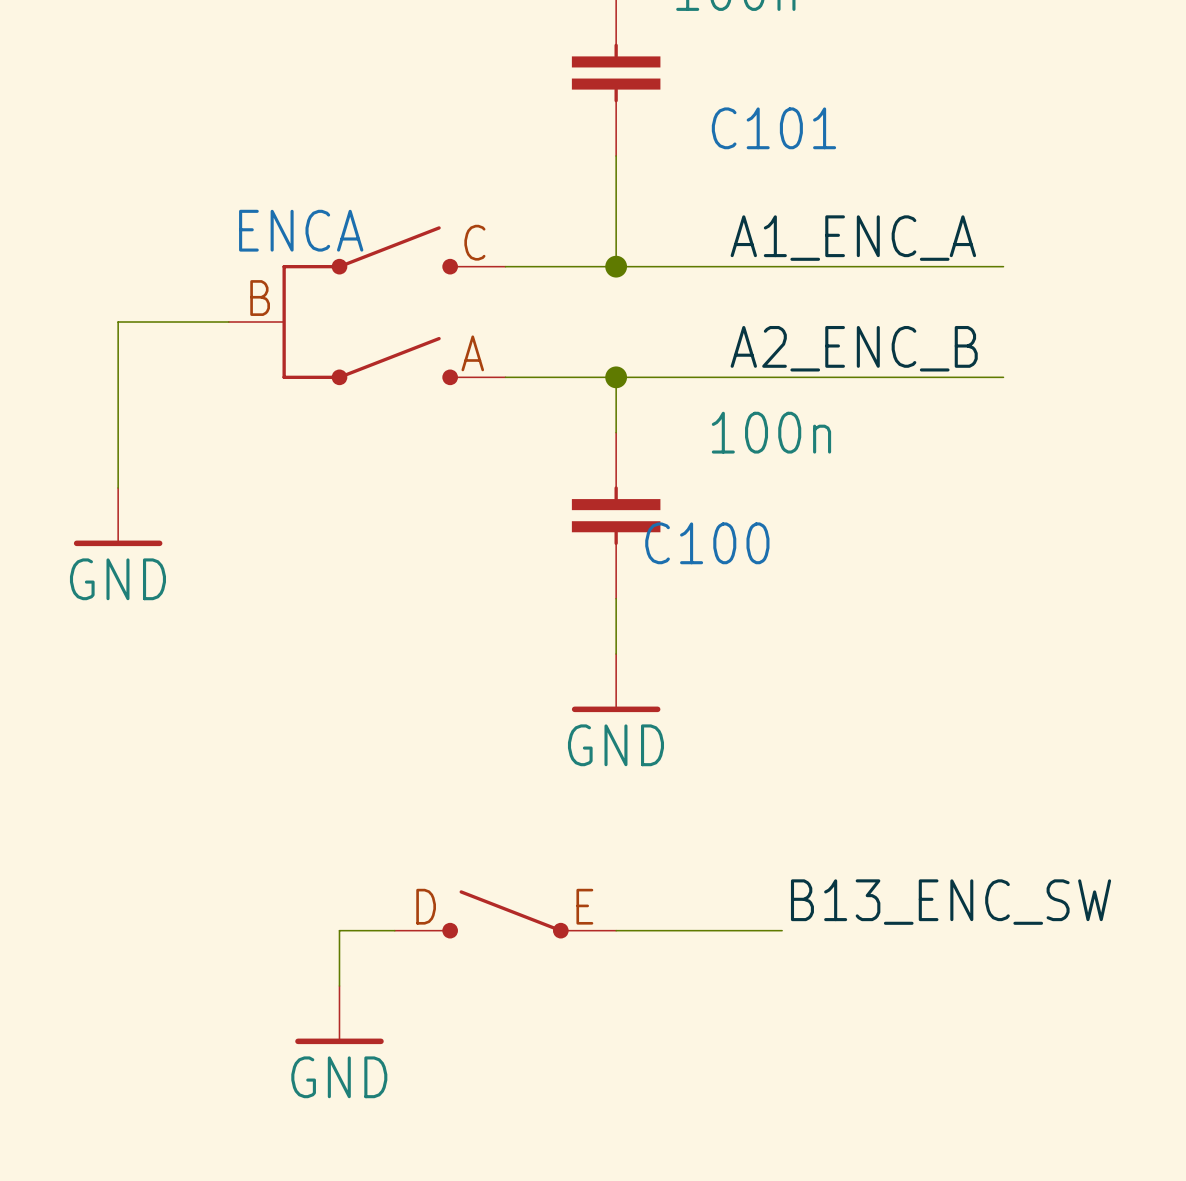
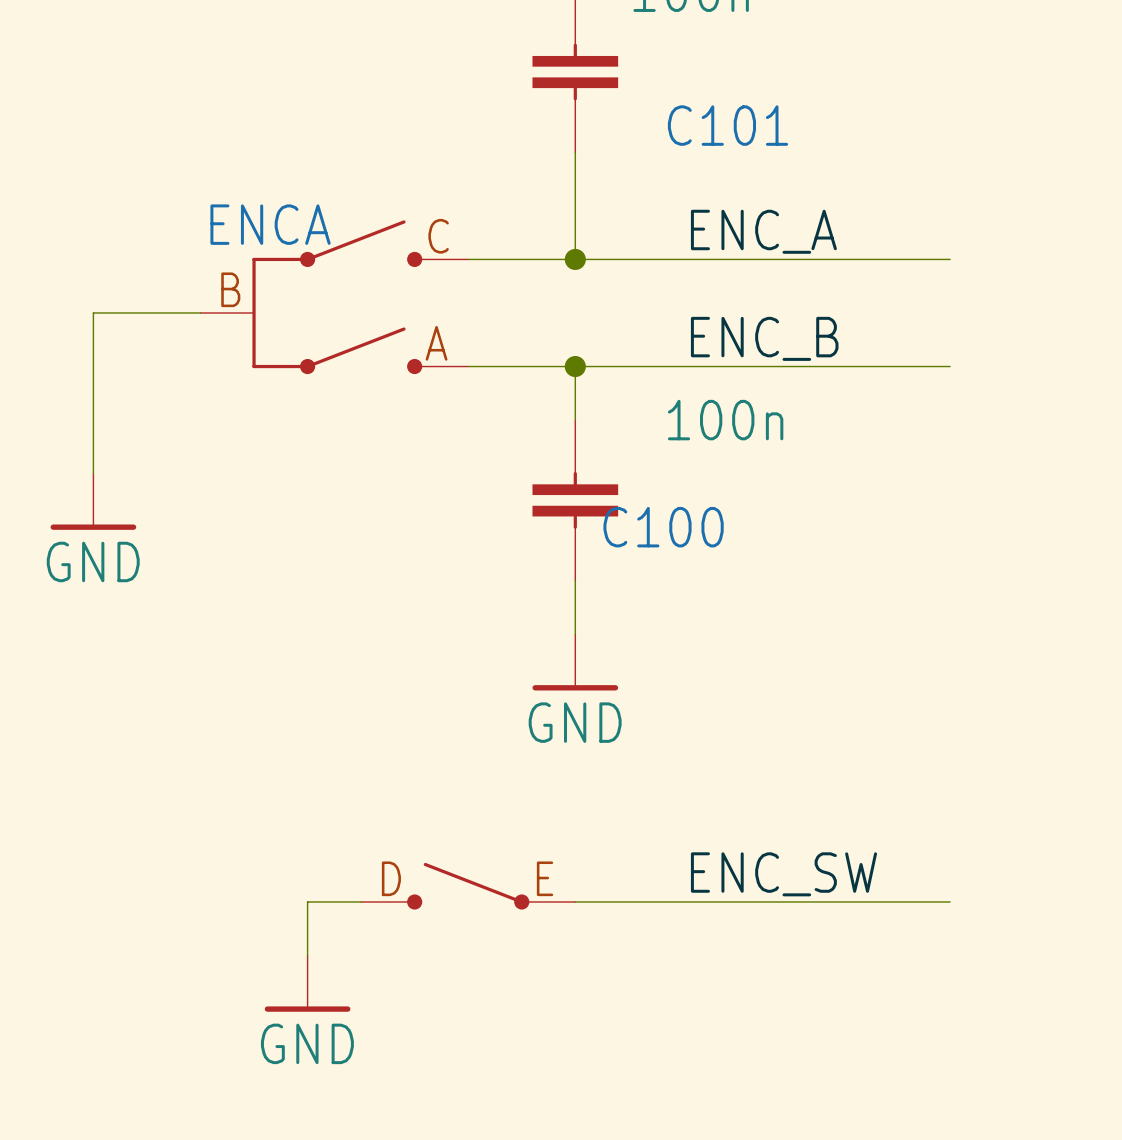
label: A1_ENC_A (853, 238) -> ENC_A (763, 231)
label: A2_ENC_B (854, 348) -> ENC_B (764, 338)
label: B13_ENC_SW (951, 902) -> ENC_SW (783, 874)
wire: none -> (735, 901) (950, 901)

